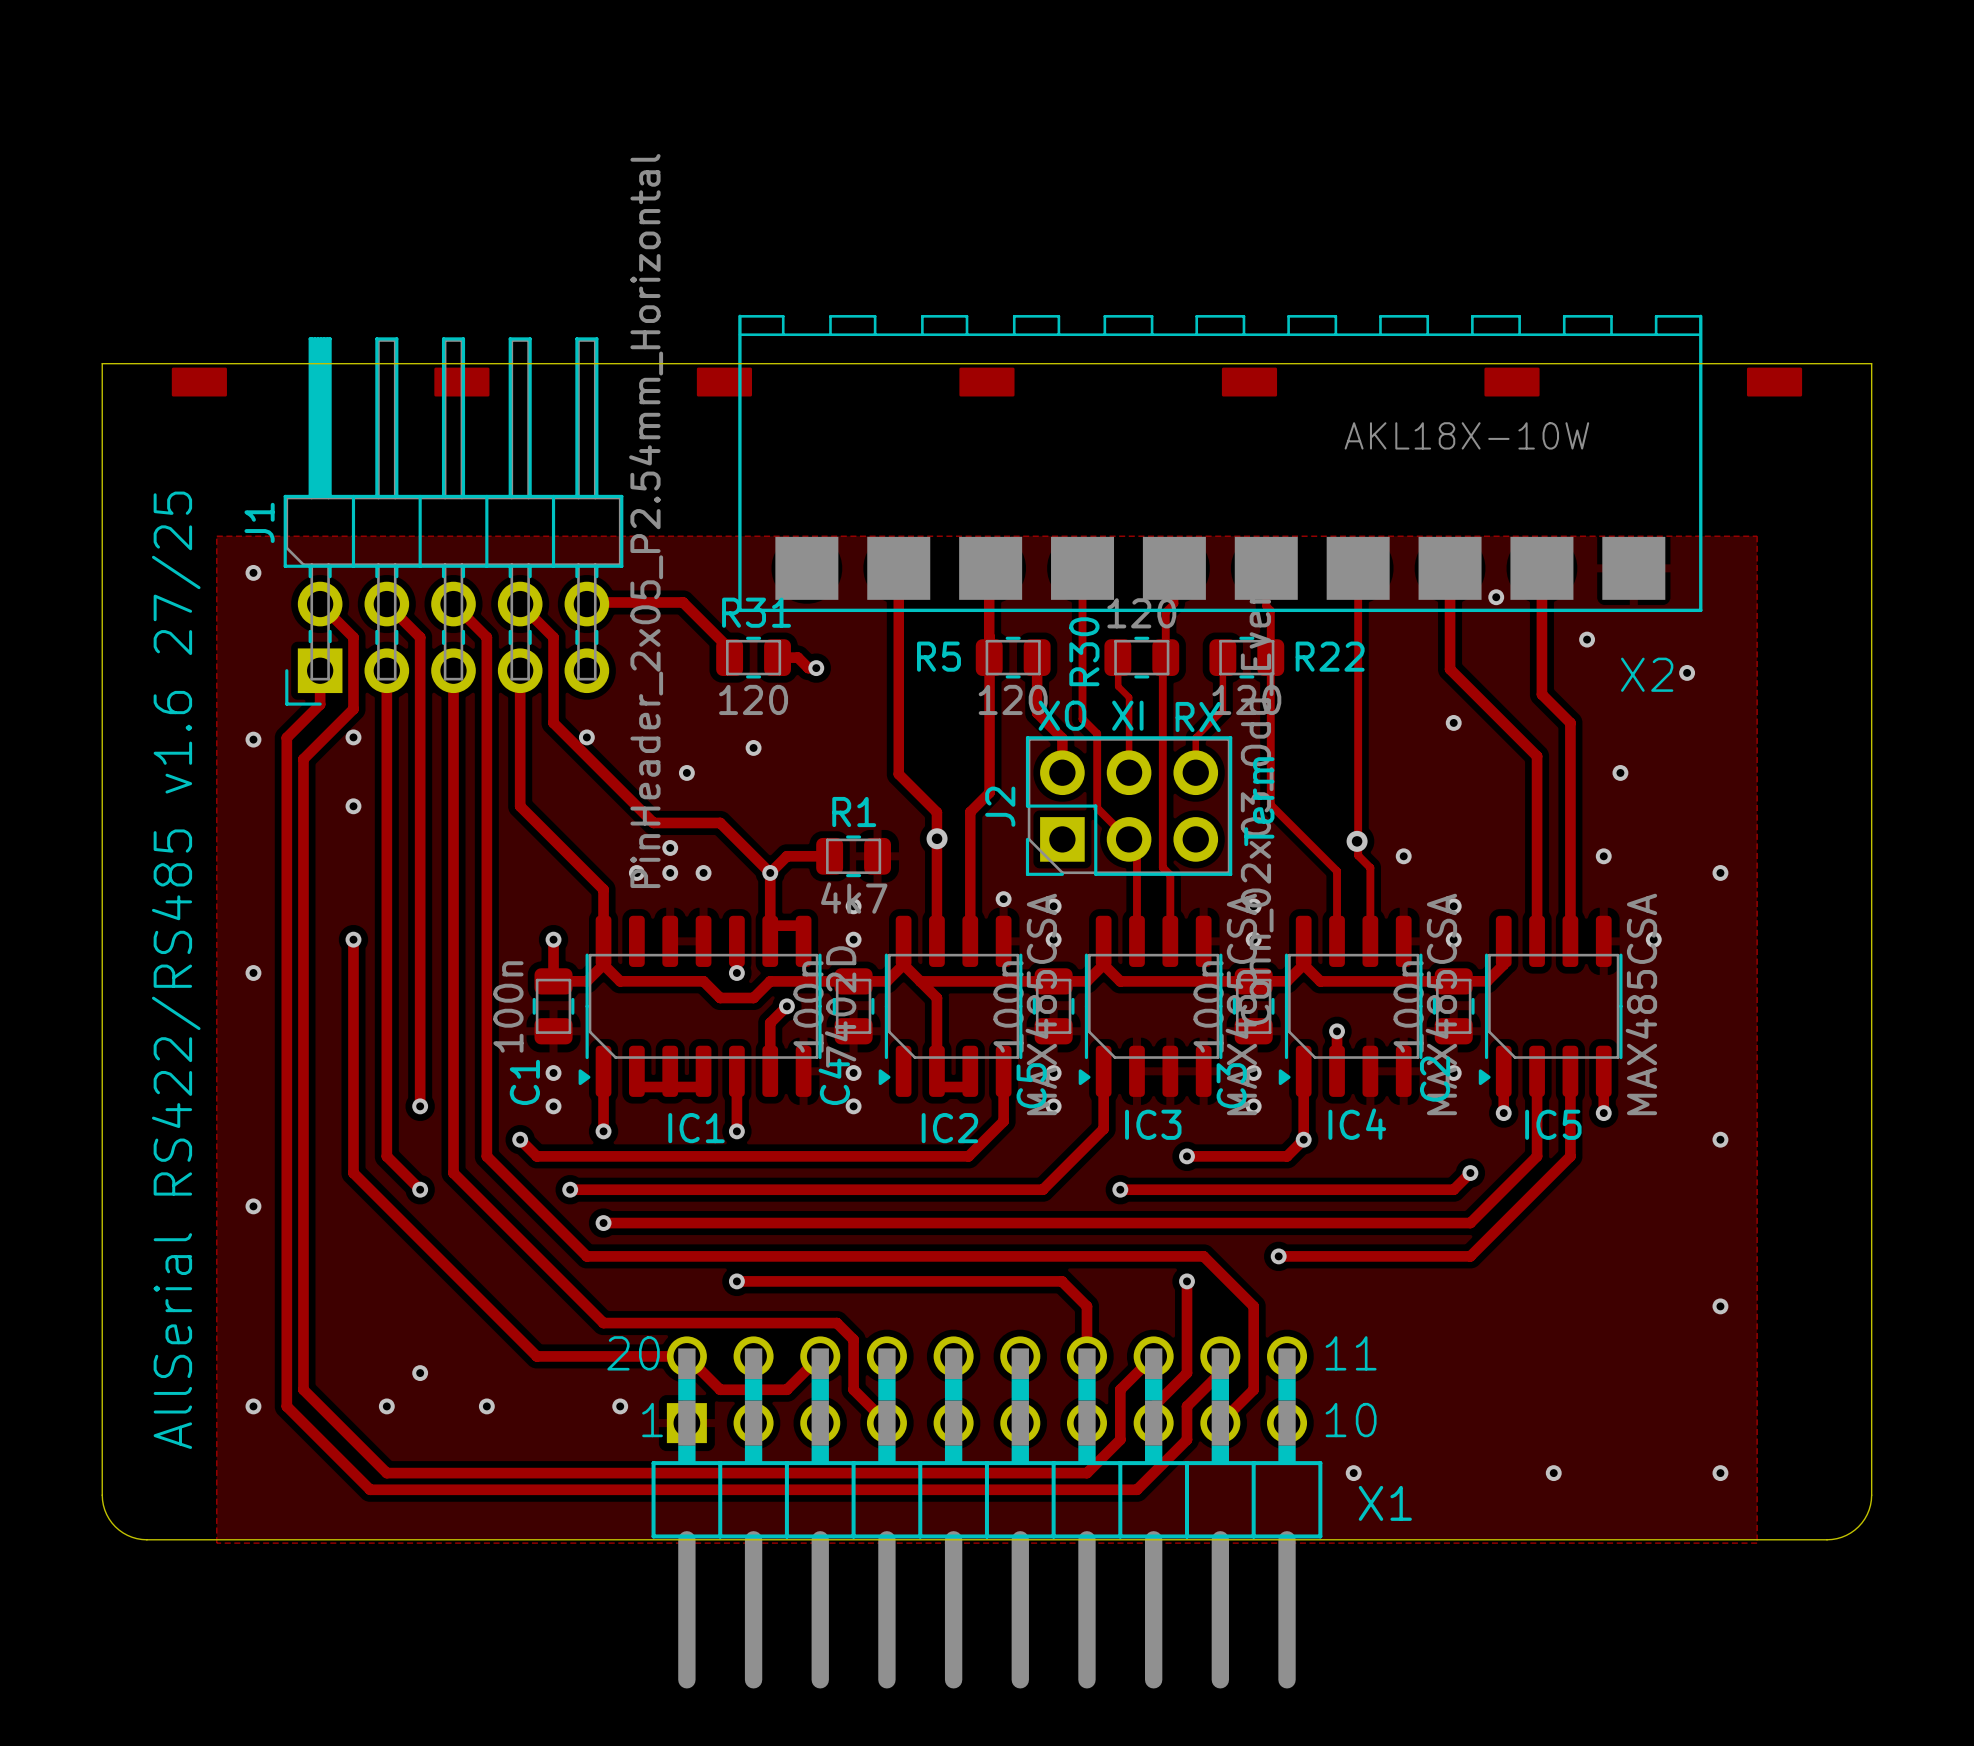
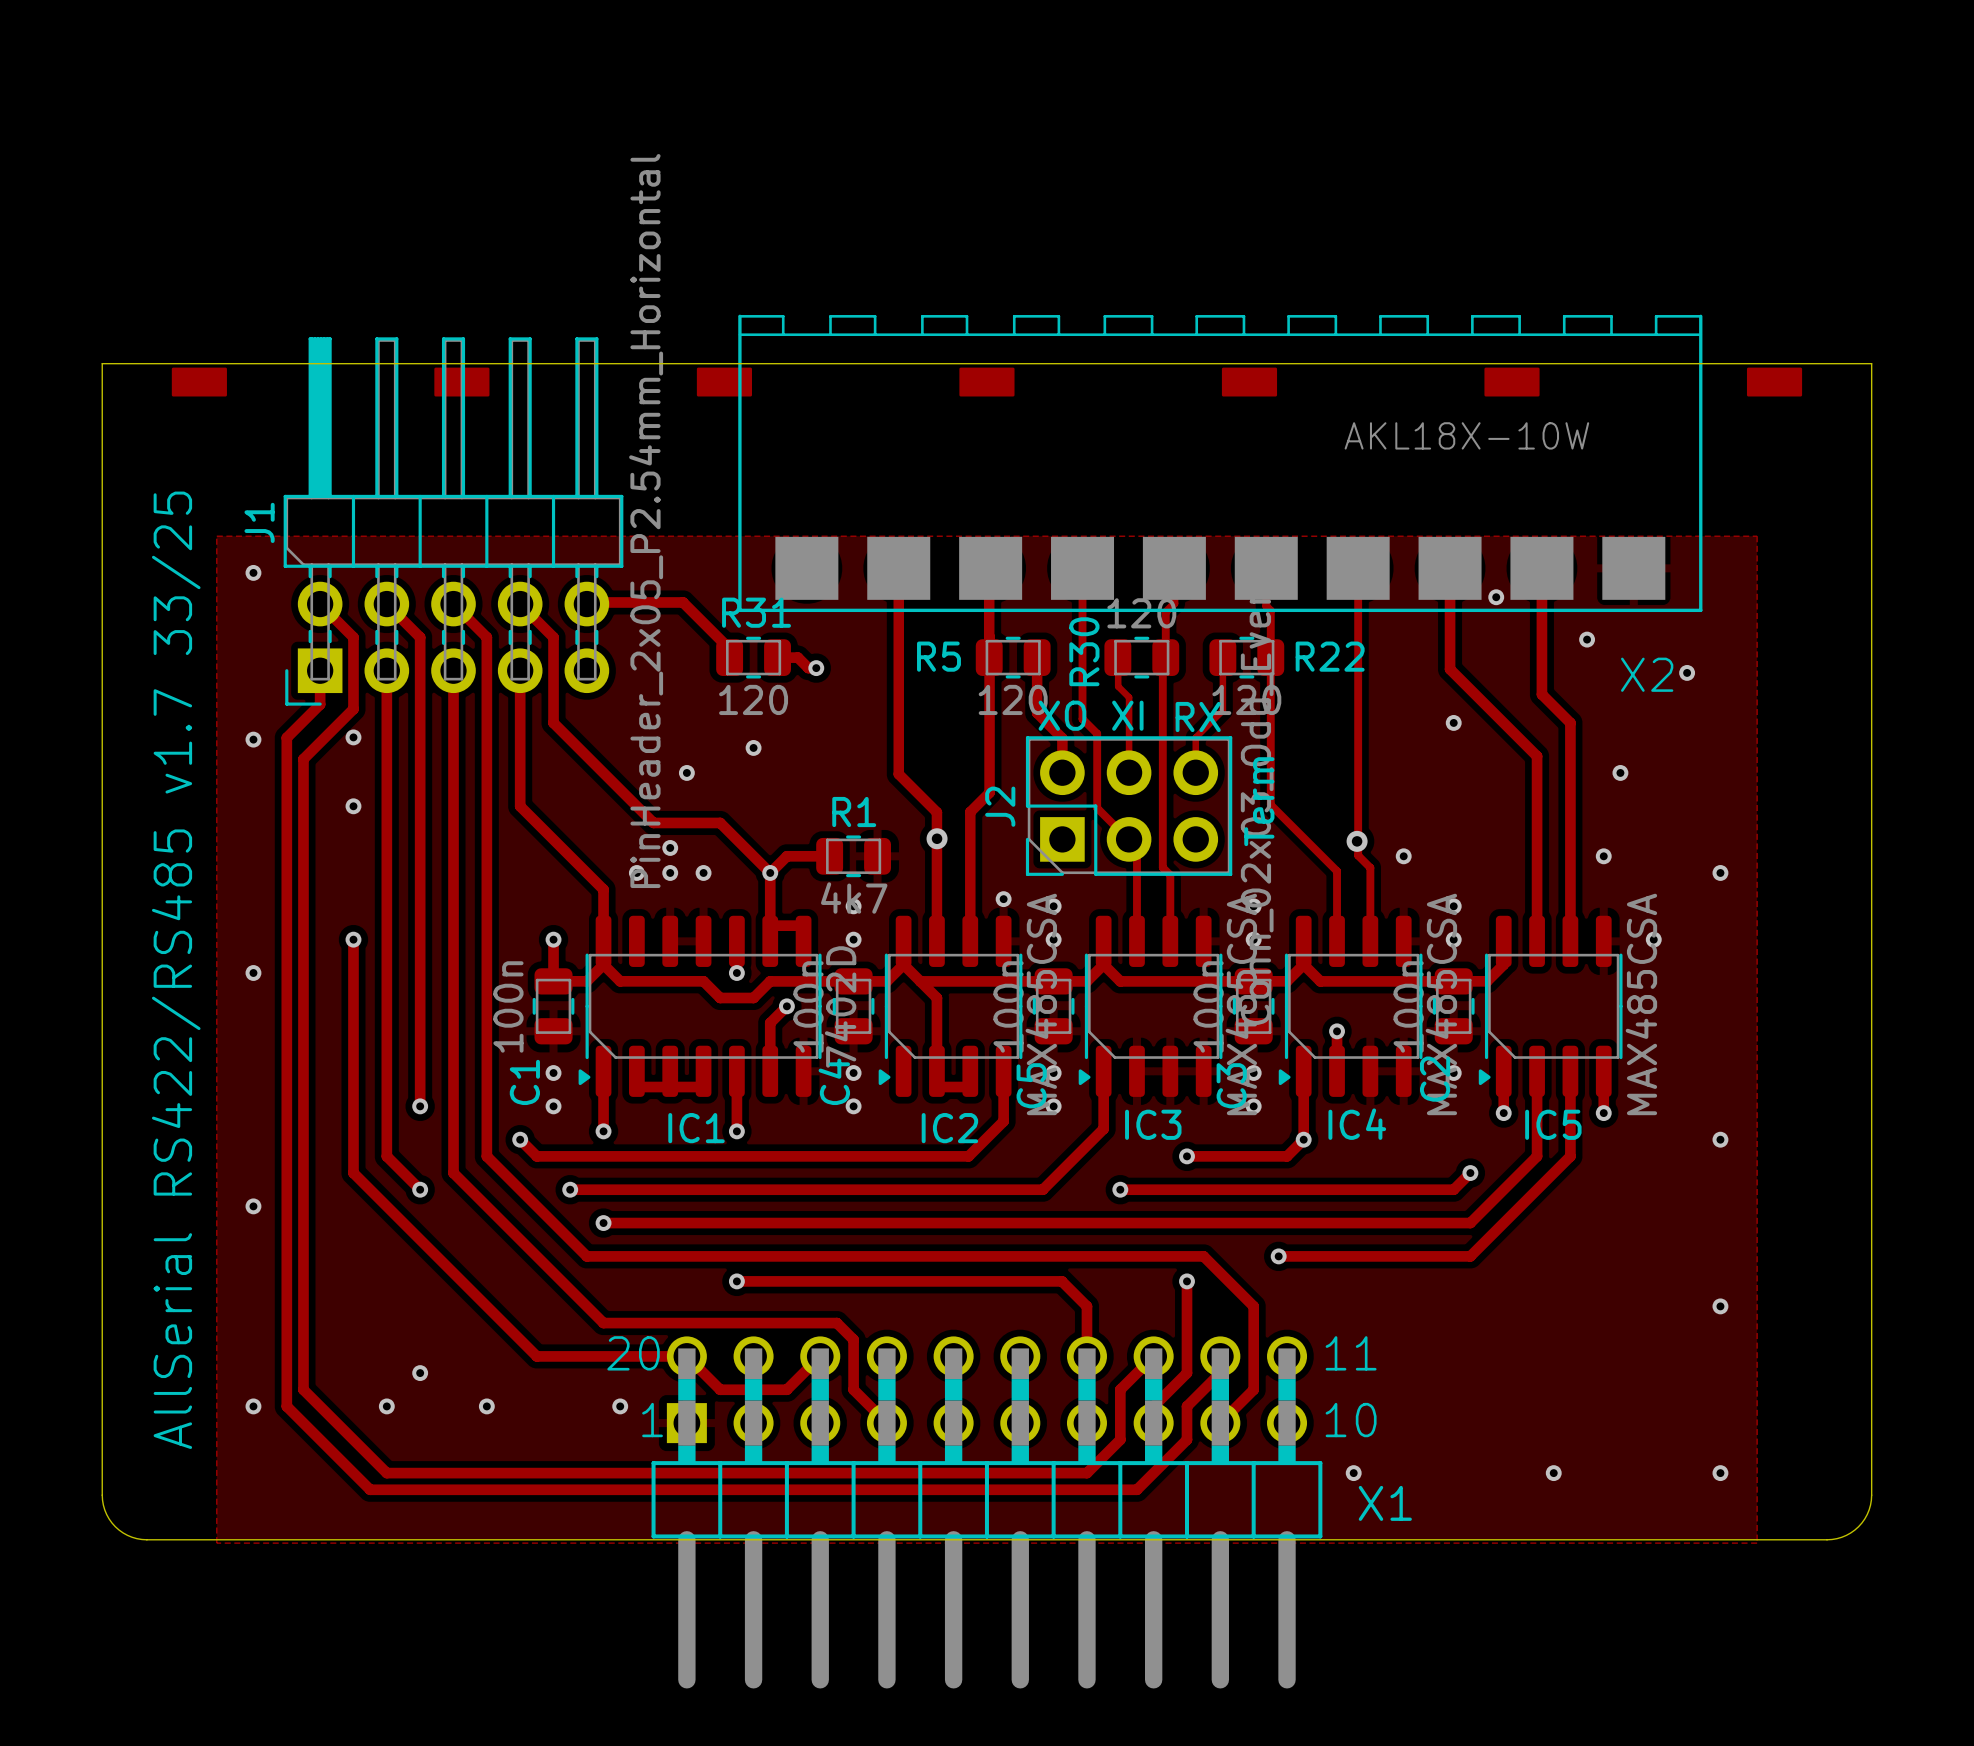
via: (586, 737) -> none
text: AllSerial RS422/RS485 v1.6 27/25 (176, 970) -> AllSerial RS422/RS485 v1.7 33/25 (176, 970)

